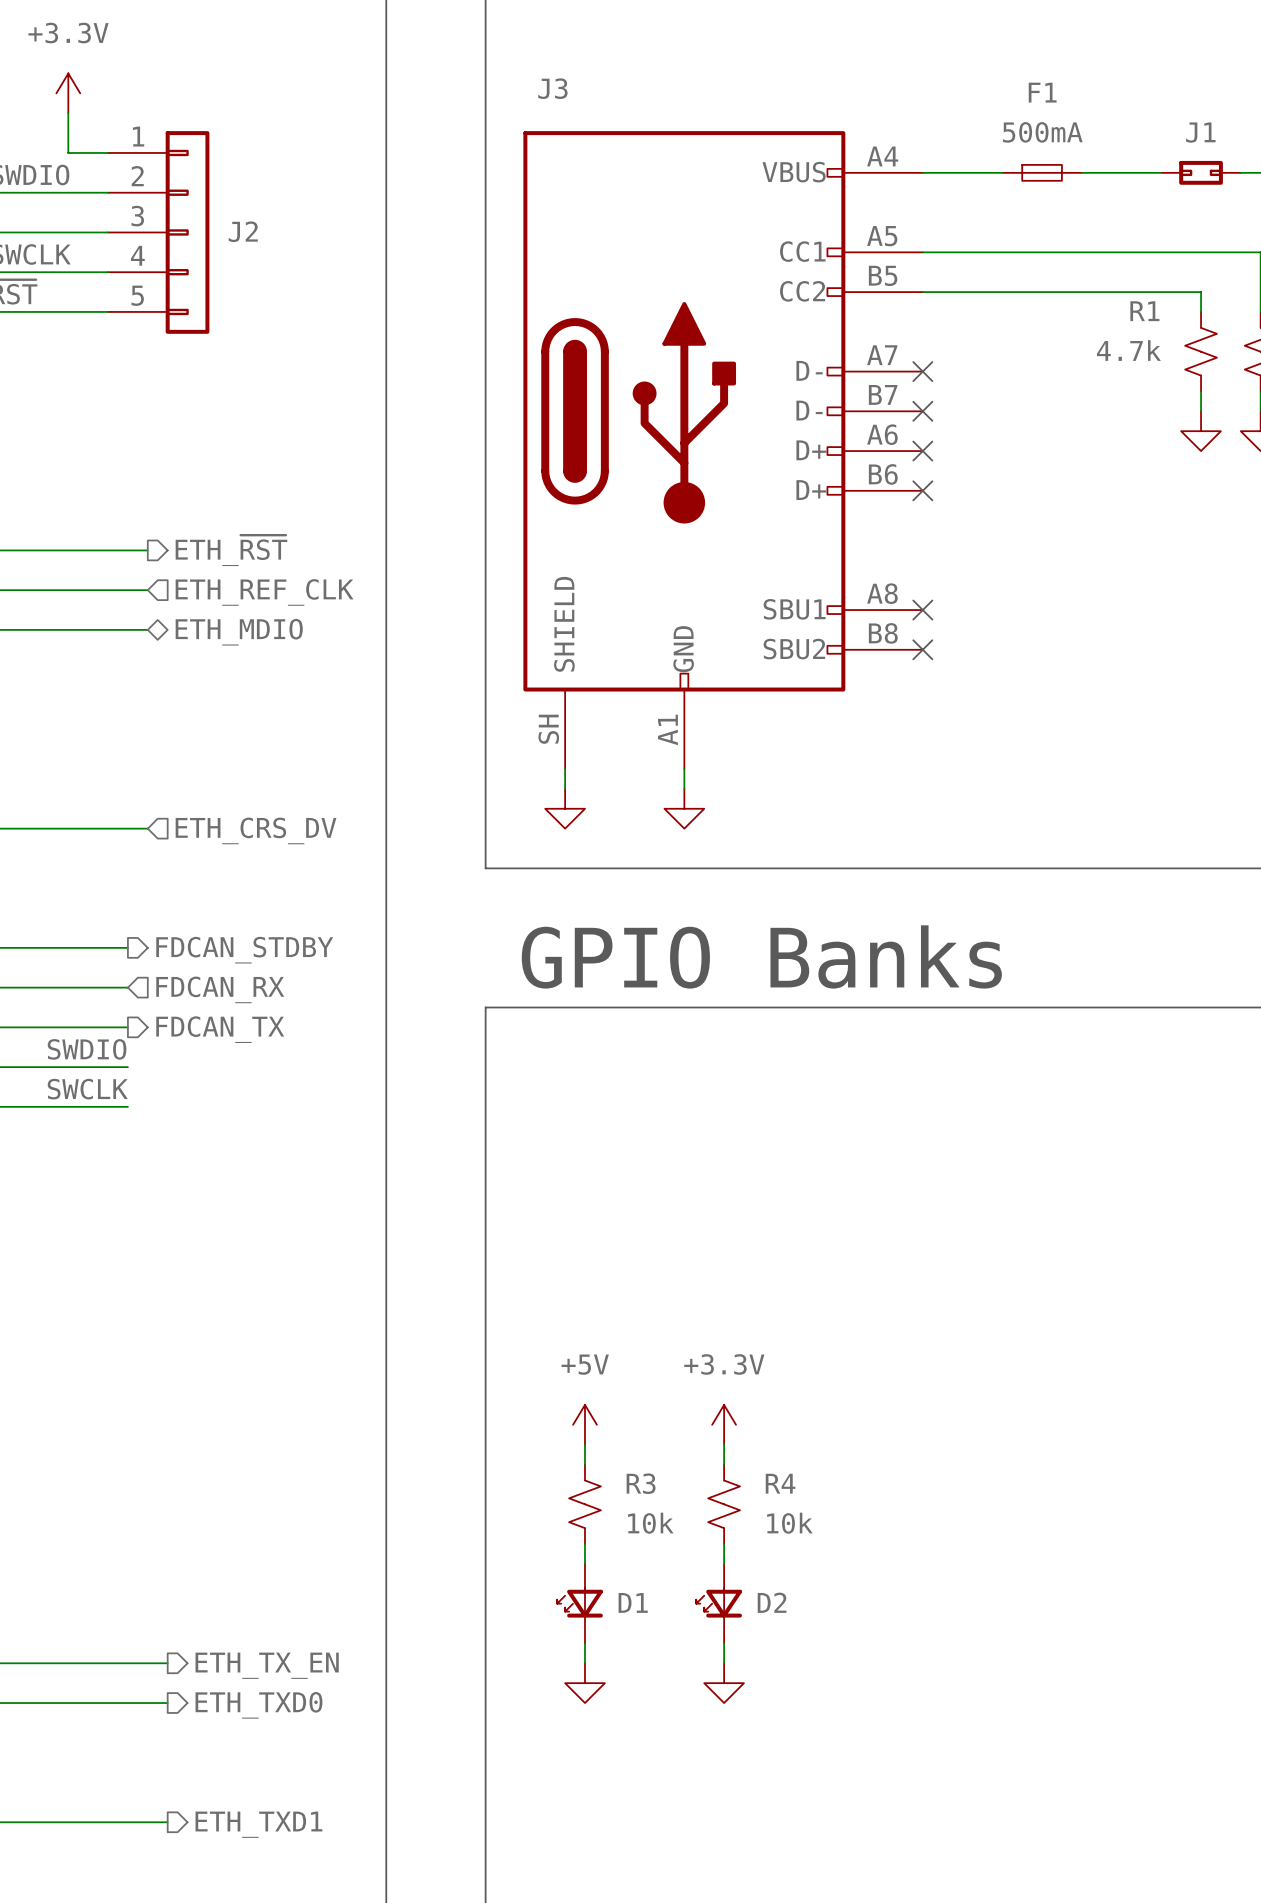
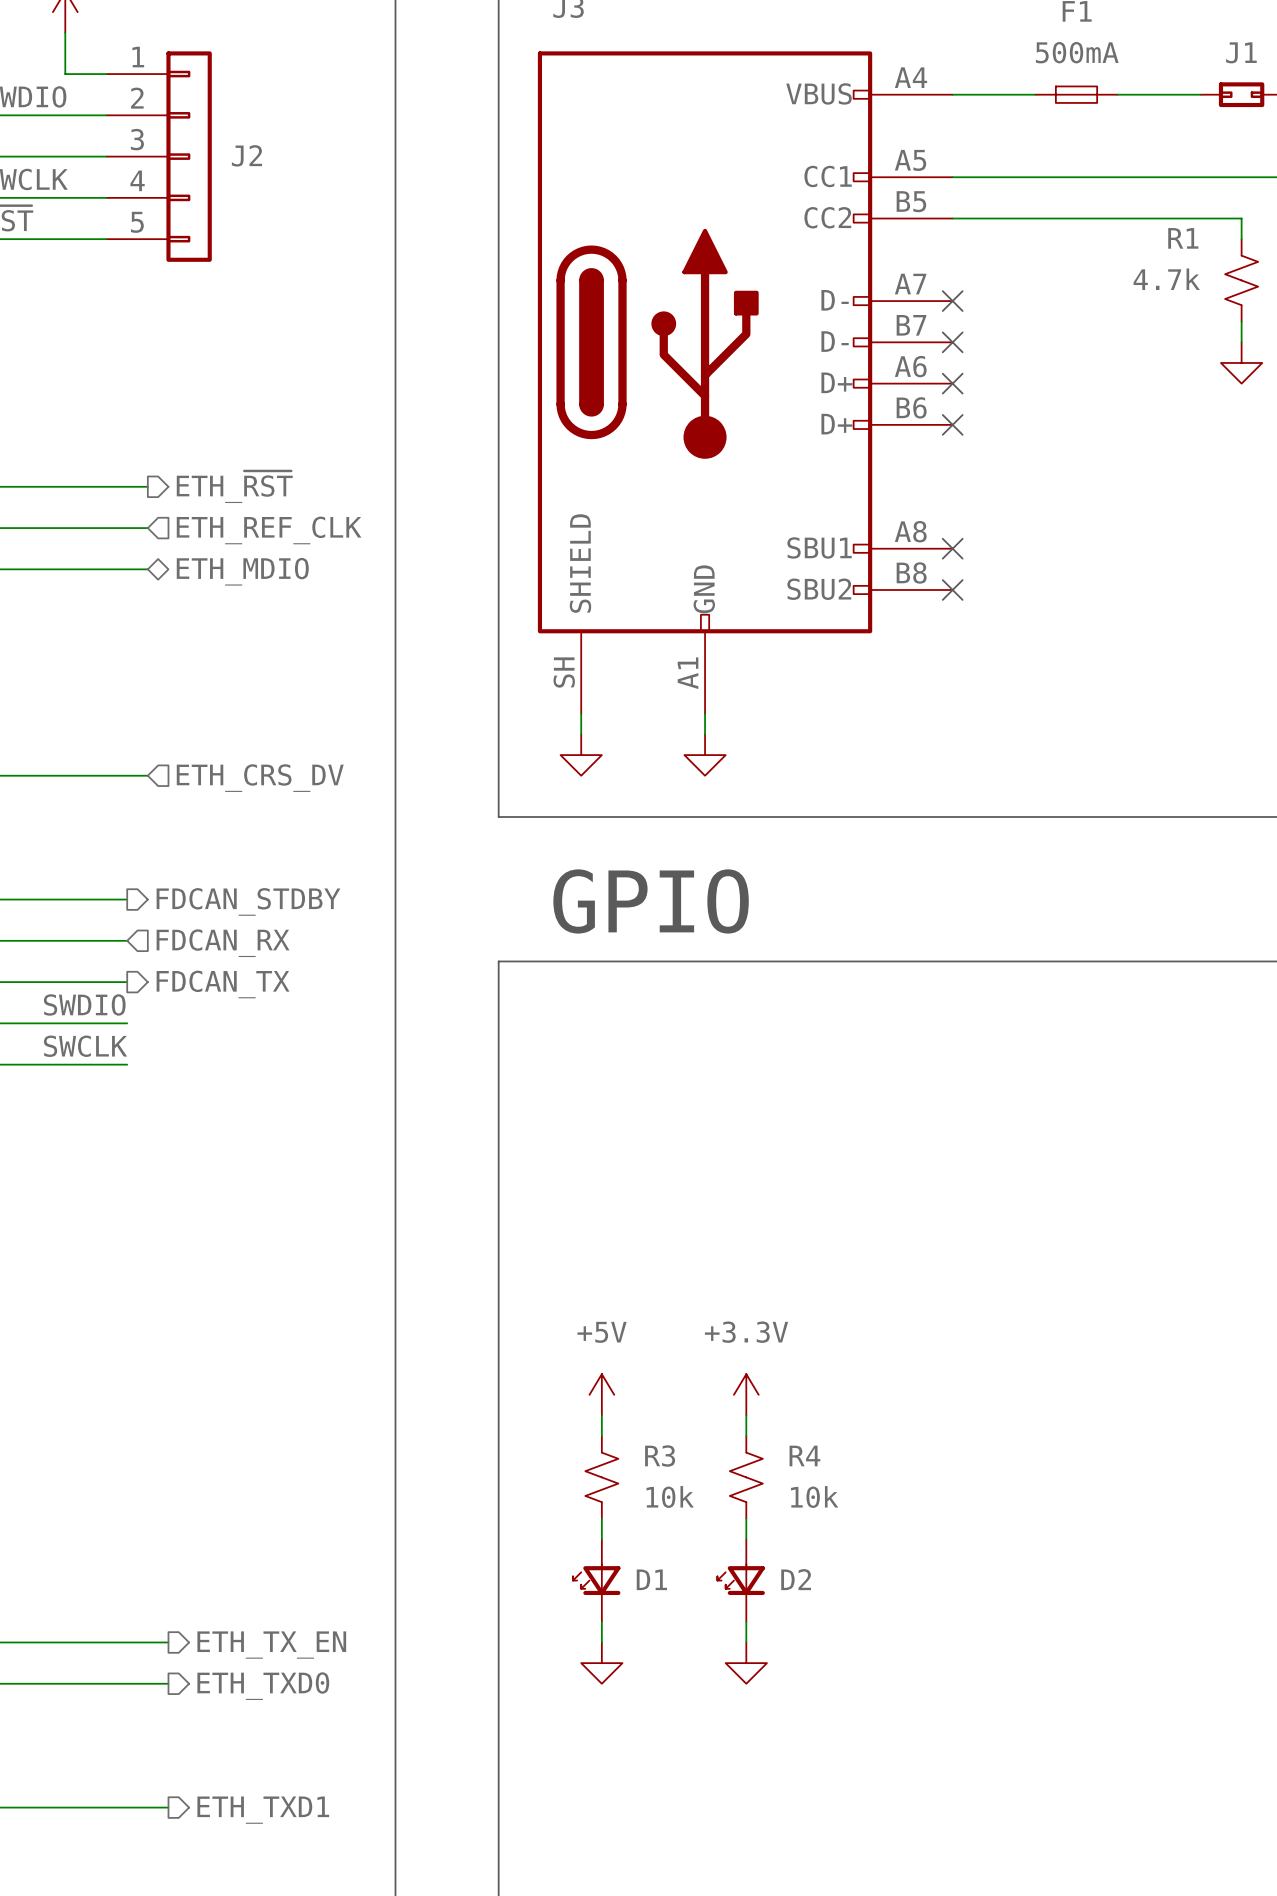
text: none -> GPIO (651, 901)
text: GPIO Banks (761, 956) -> none

